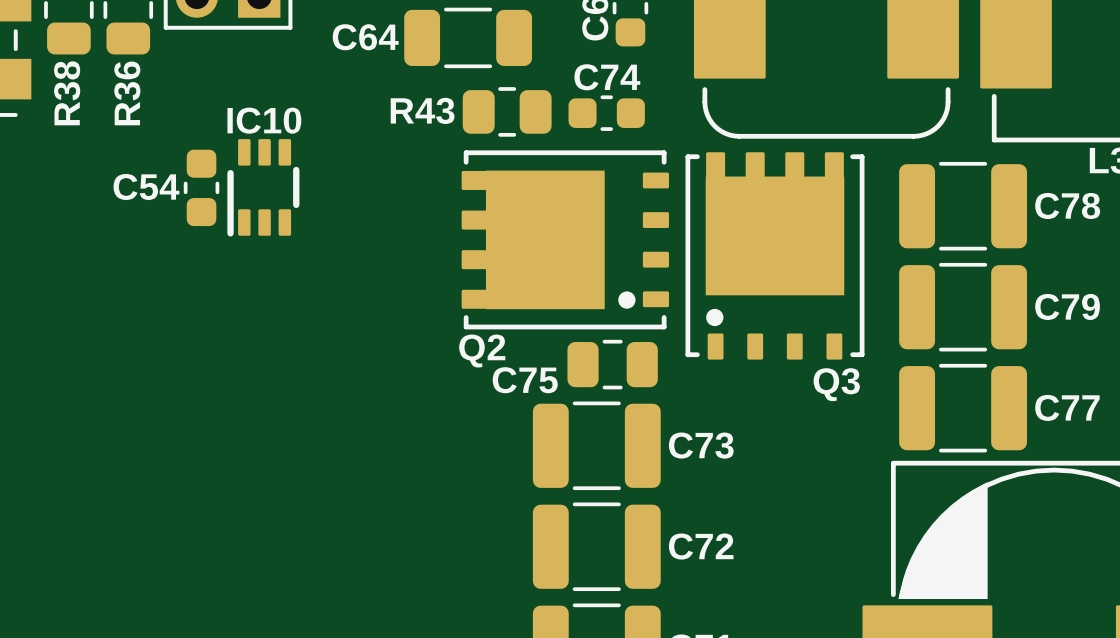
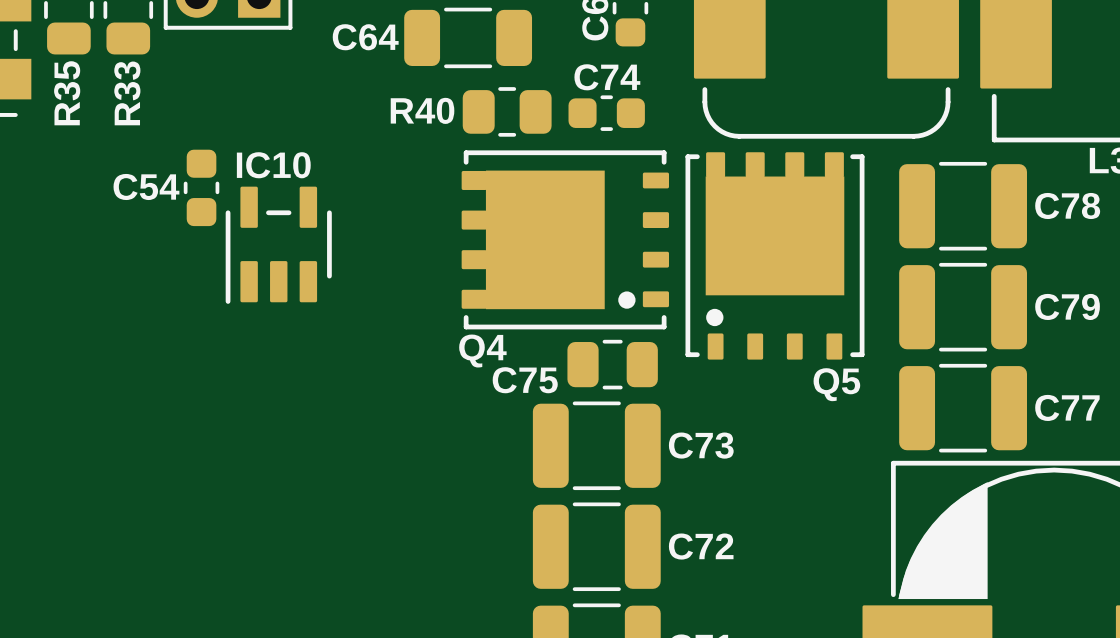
R38 name: R38 (67, 93) -> R35 (67, 93)
R36 name: R36 (127, 93) -> R33 (127, 93)
R43 name: R43 (422, 110) -> R40 (422, 110)
IC10 footprint: [227, 139, 300, 237] -> [225, 186, 332, 304]
Q2 name: Q2 (482, 351) -> Q4 (482, 351)
Q3 name: Q3 (836, 384) -> Q5 (836, 384)

